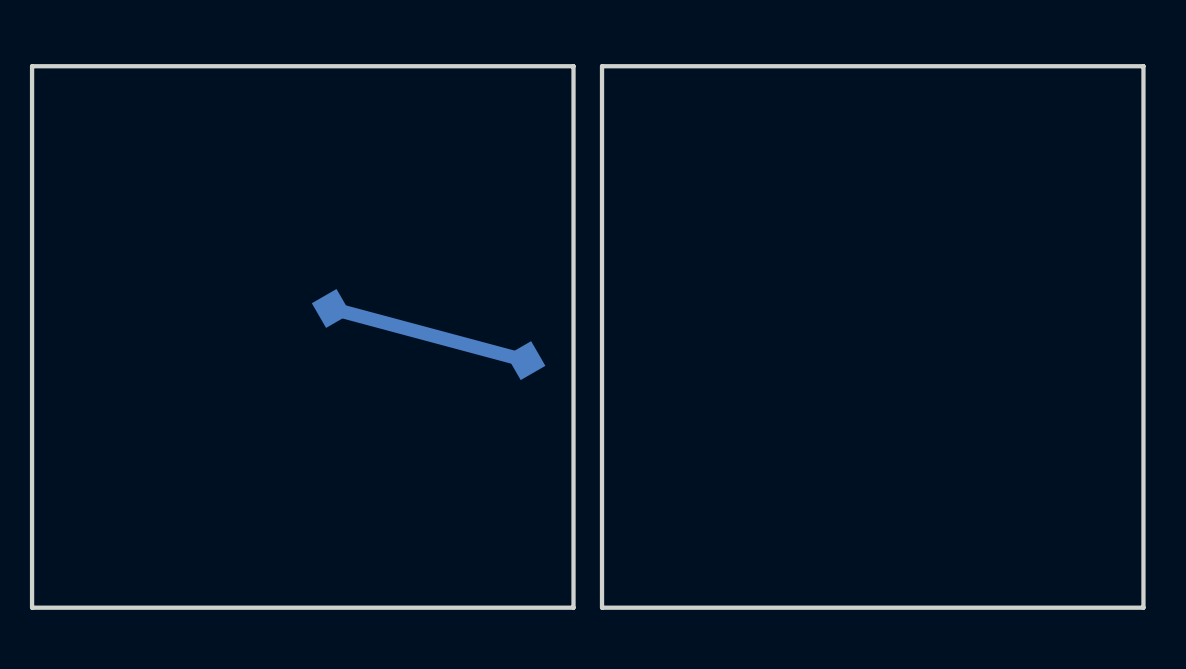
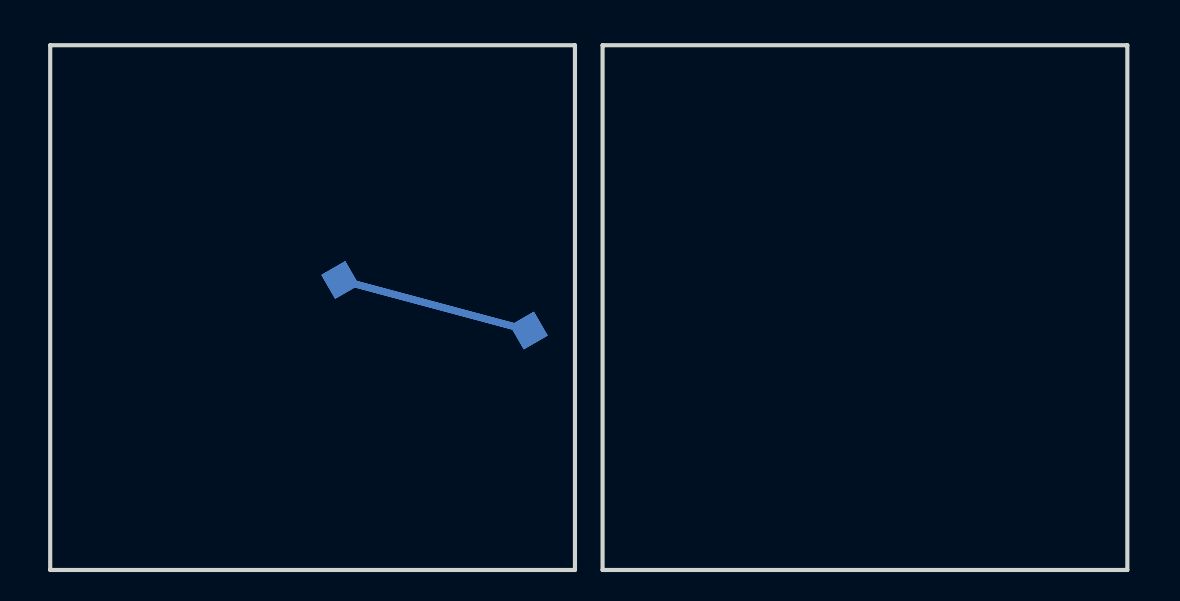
track width: thick (331, 308) (525, 360) -> thin (340, 279) (528, 330)

